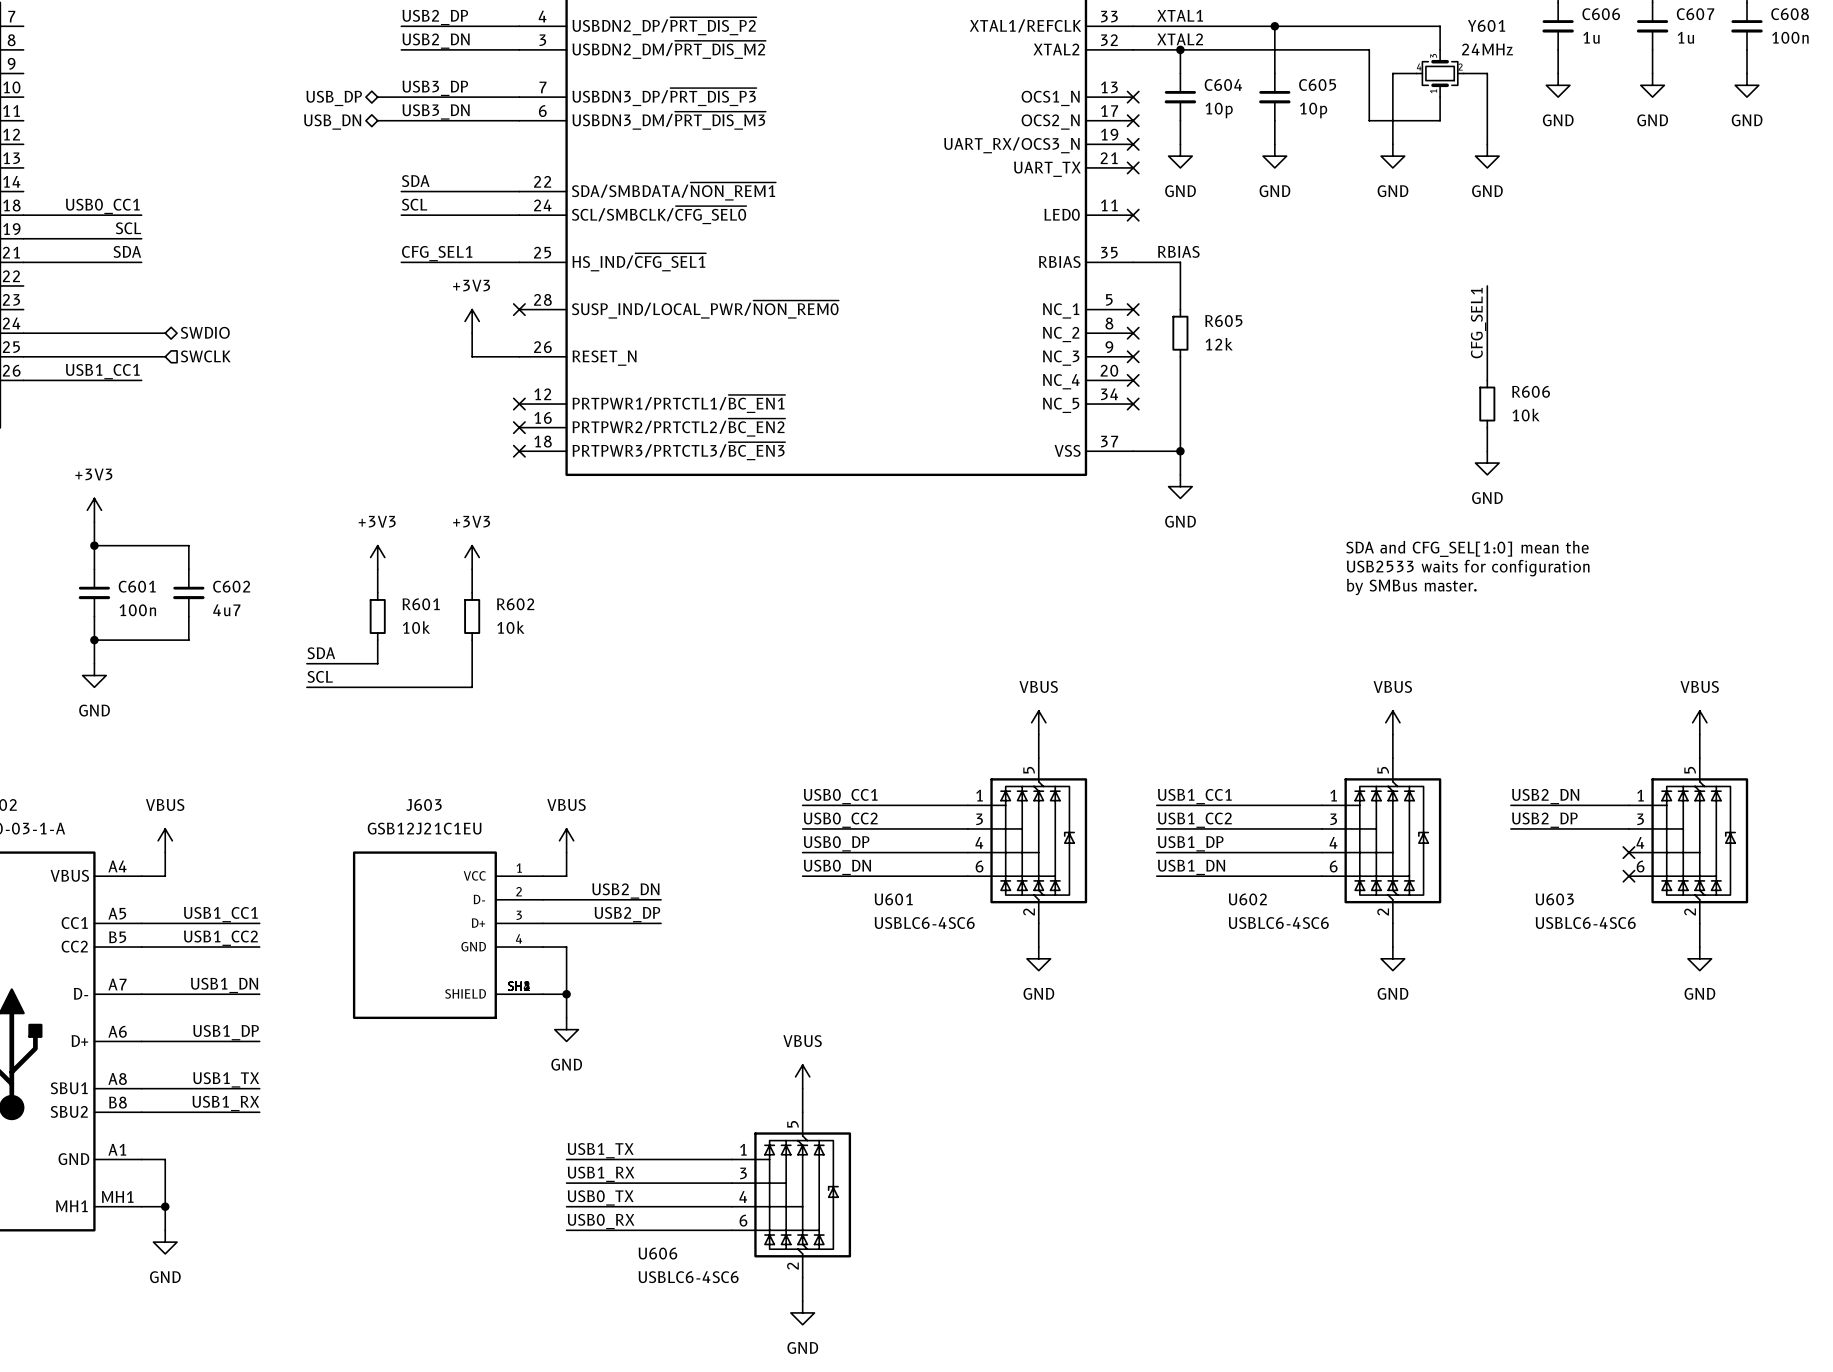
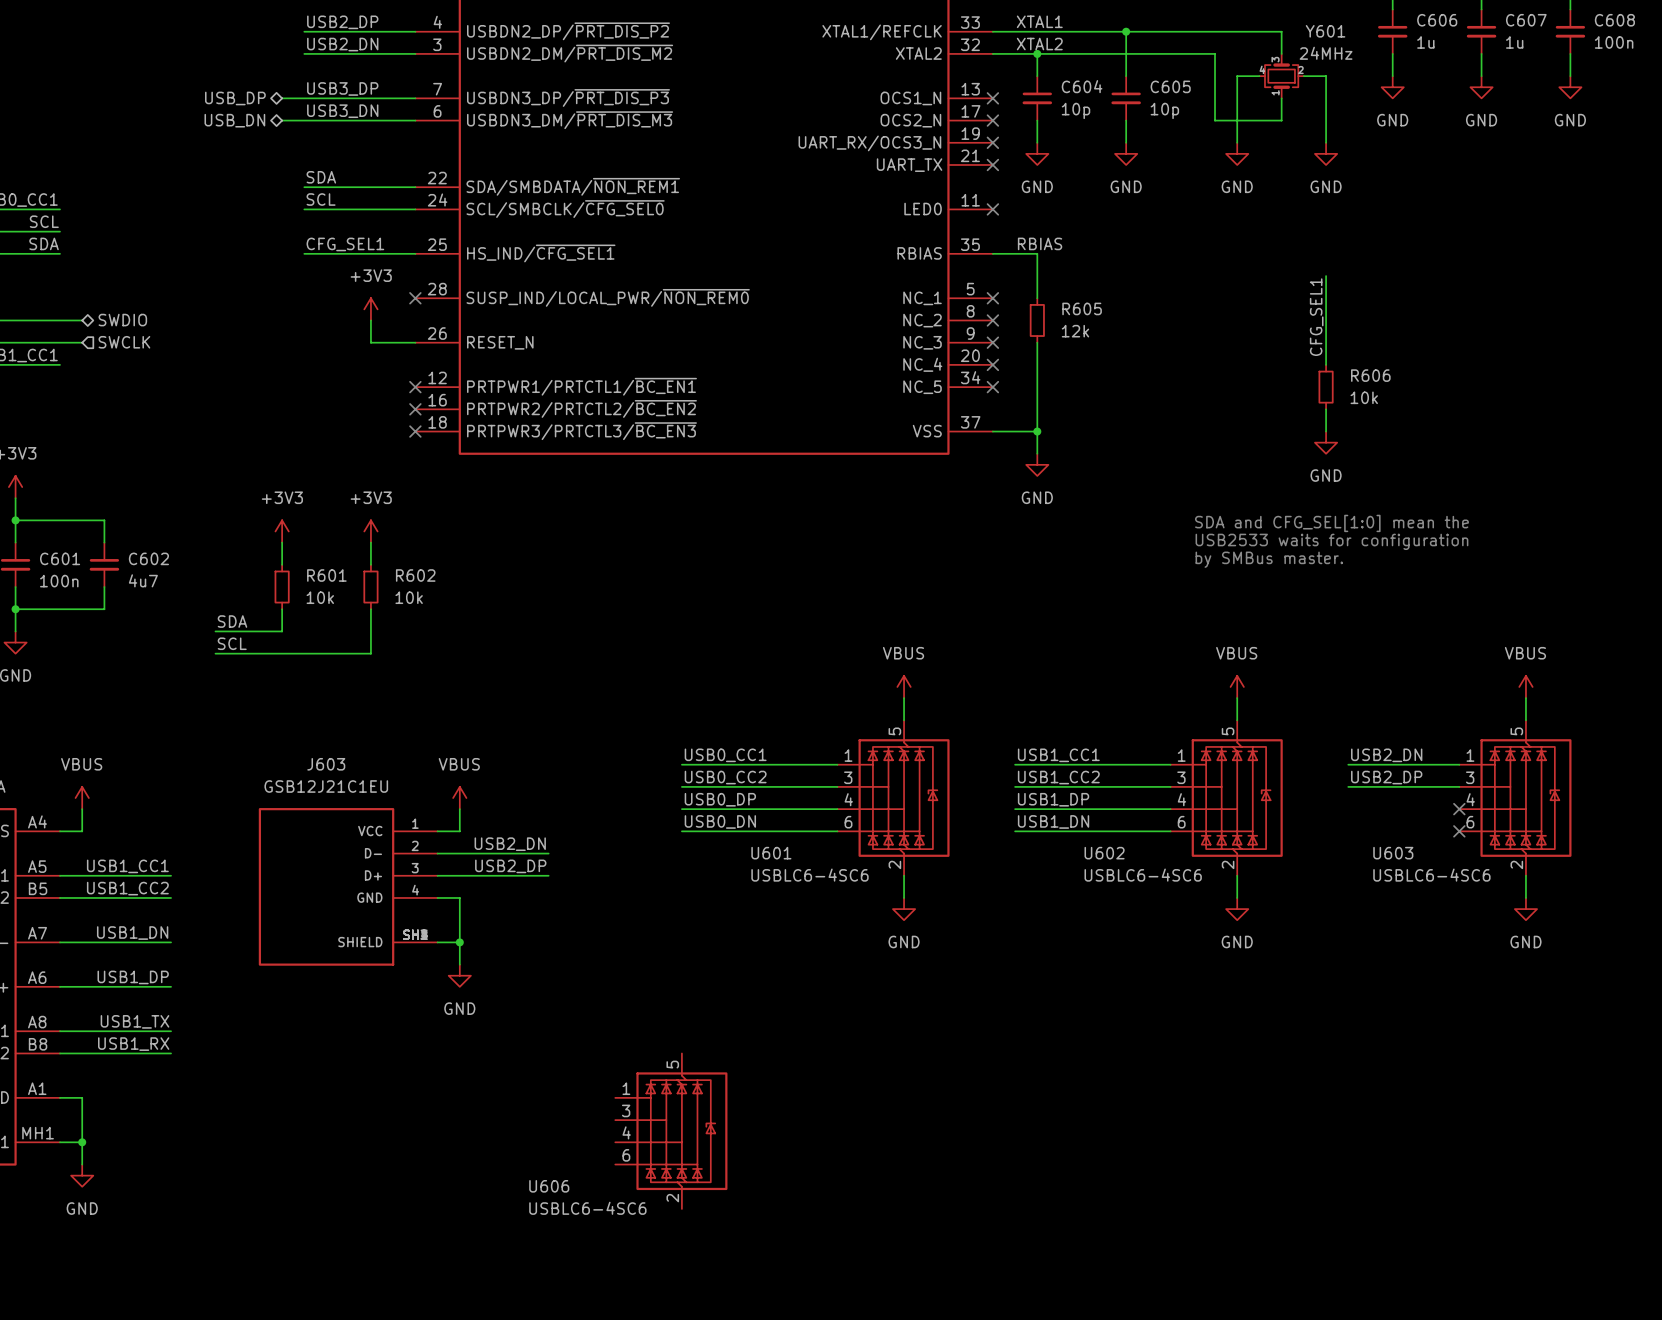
power symbol: VBUS (802, 1076) -> none
wire: (802, 1088) (802, 1112) -> none
label: USB1_TX (600, 1150) -> none
wire: (566, 1159) (731, 1159) -> none
label: USB1_RX (601, 1174) -> none
wire: (566, 1183) (731, 1183) -> none
label: USB0_TX (600, 1197) -> none
wire: (566, 1206) (731, 1206) -> none
label: USB0_RX (601, 1221) -> none
wire: (566, 1230) (731, 1230) -> none
wire: (802, 1277) (802, 1301) -> none
power symbol: GND (802, 1312) -> none

